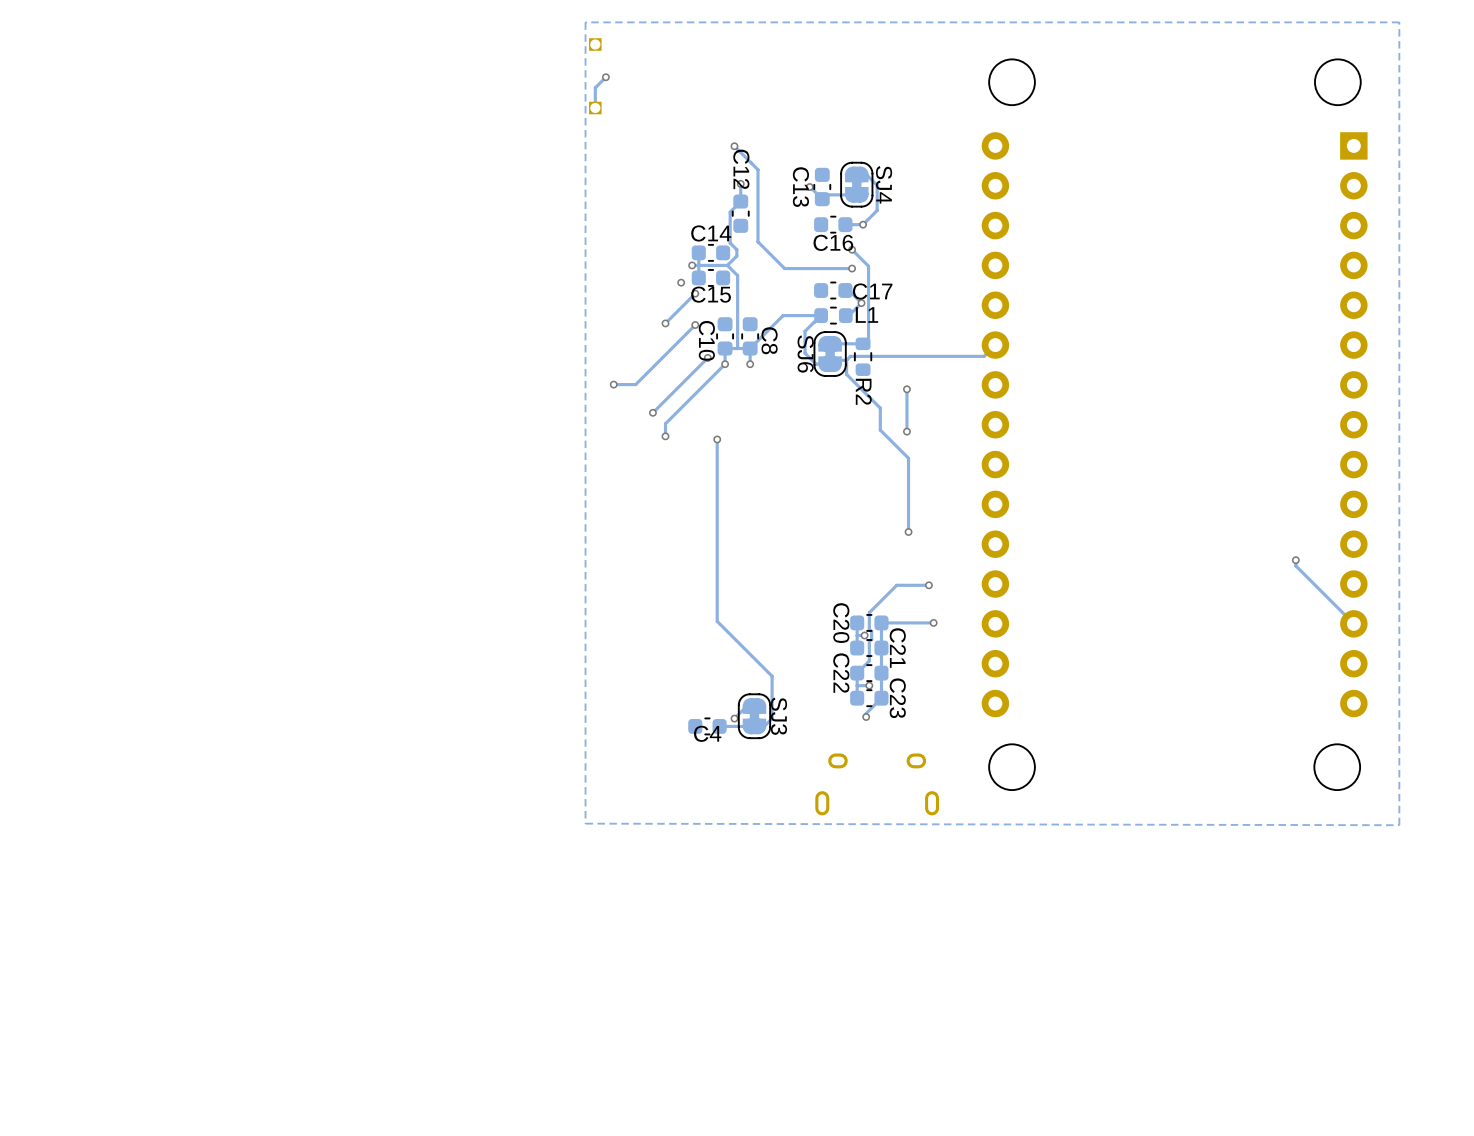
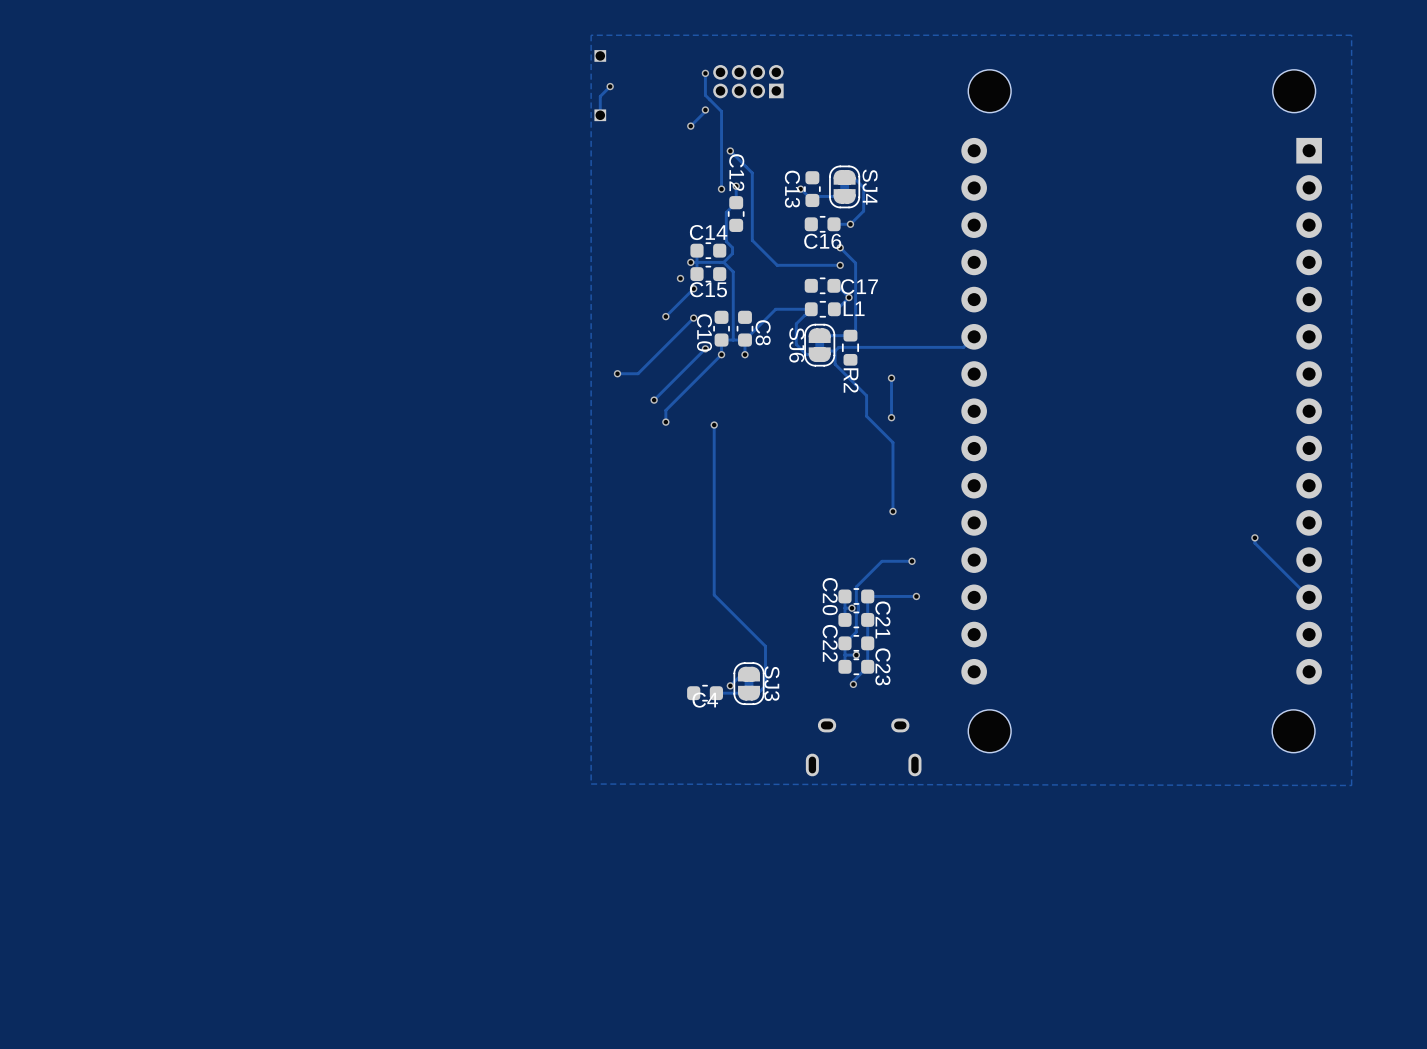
track: none -> (705, 73) (705, 95) (721, 111) (721, 189)
via: none -> (705, 73)
part: none -> (748, 81)
track: none -> (705, 109) (690, 126)
via: none -> (705, 109)
via: none -> (690, 126)
via: none -> (721, 189)

